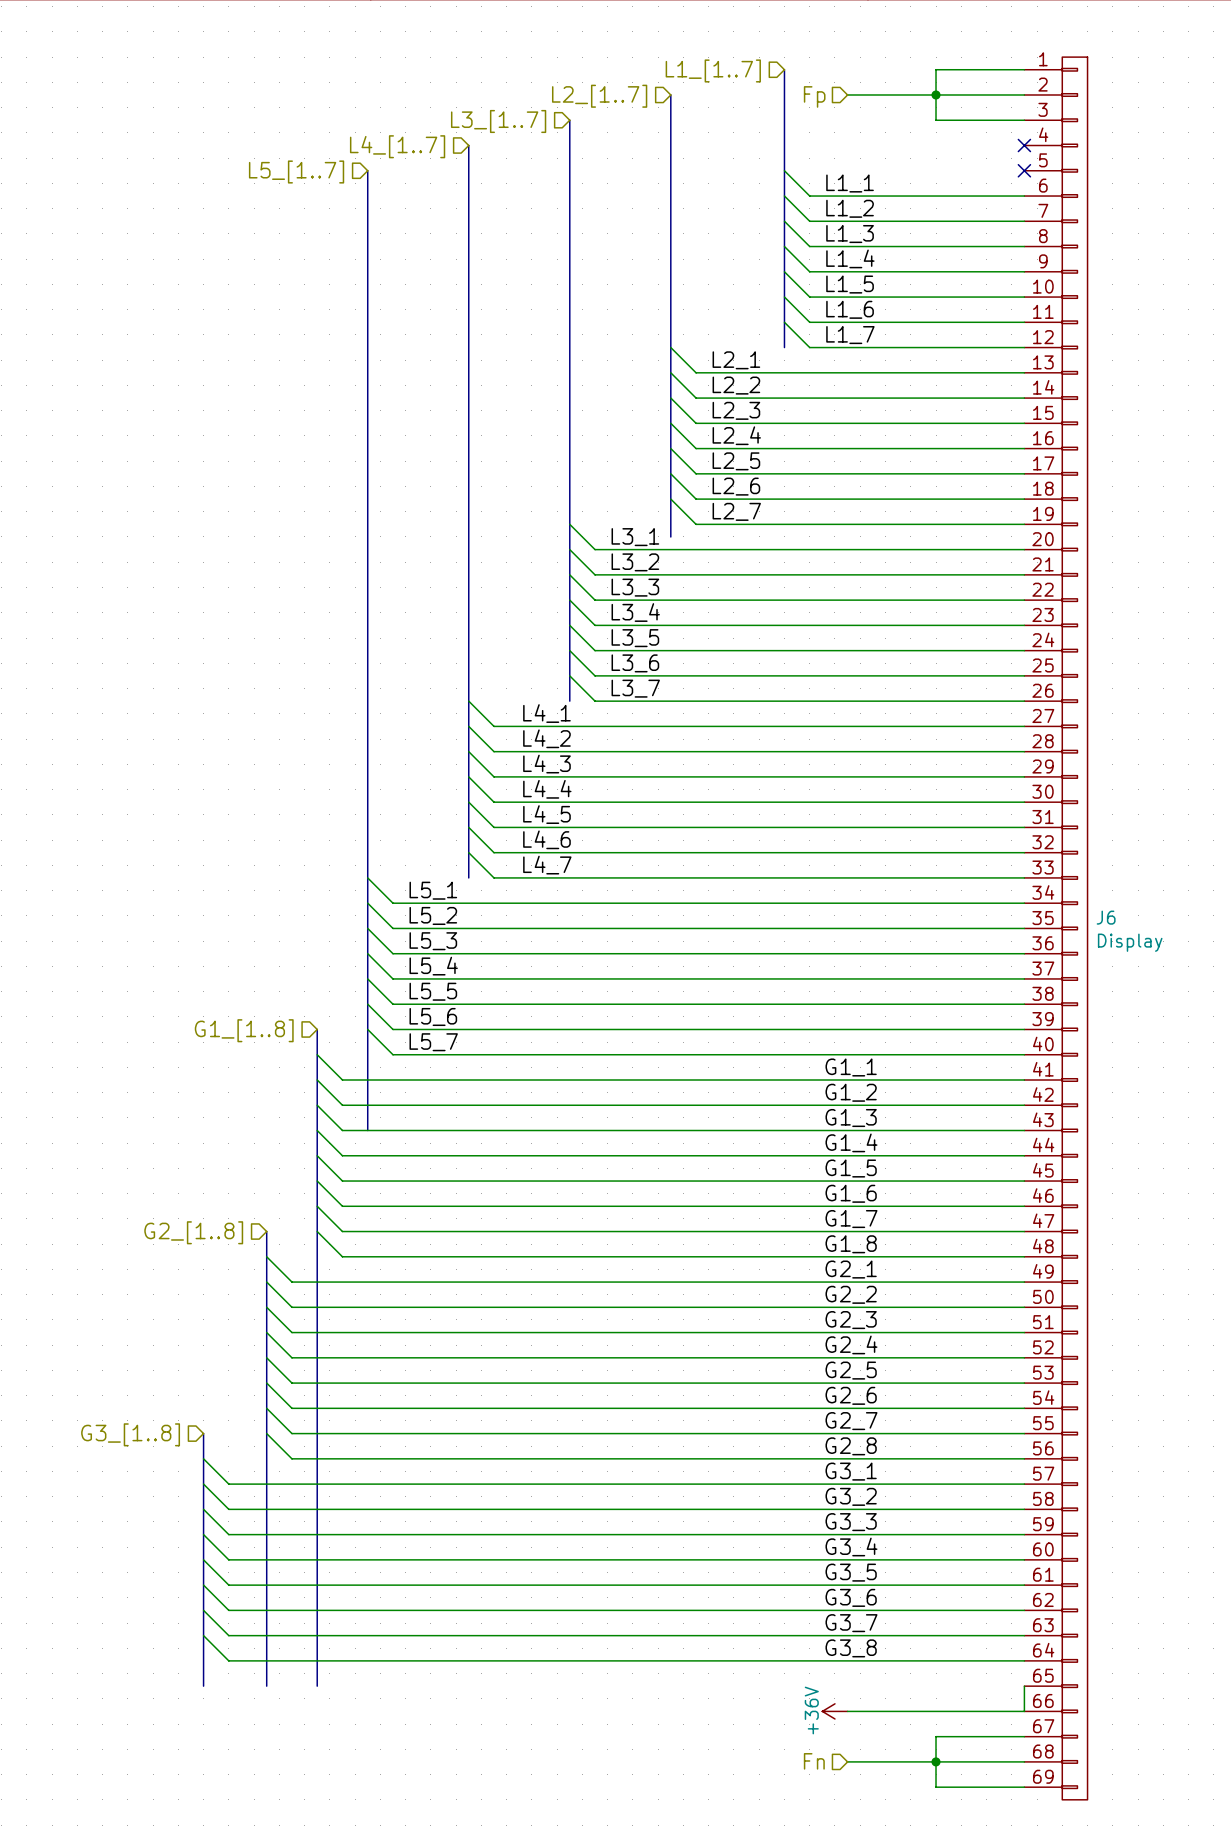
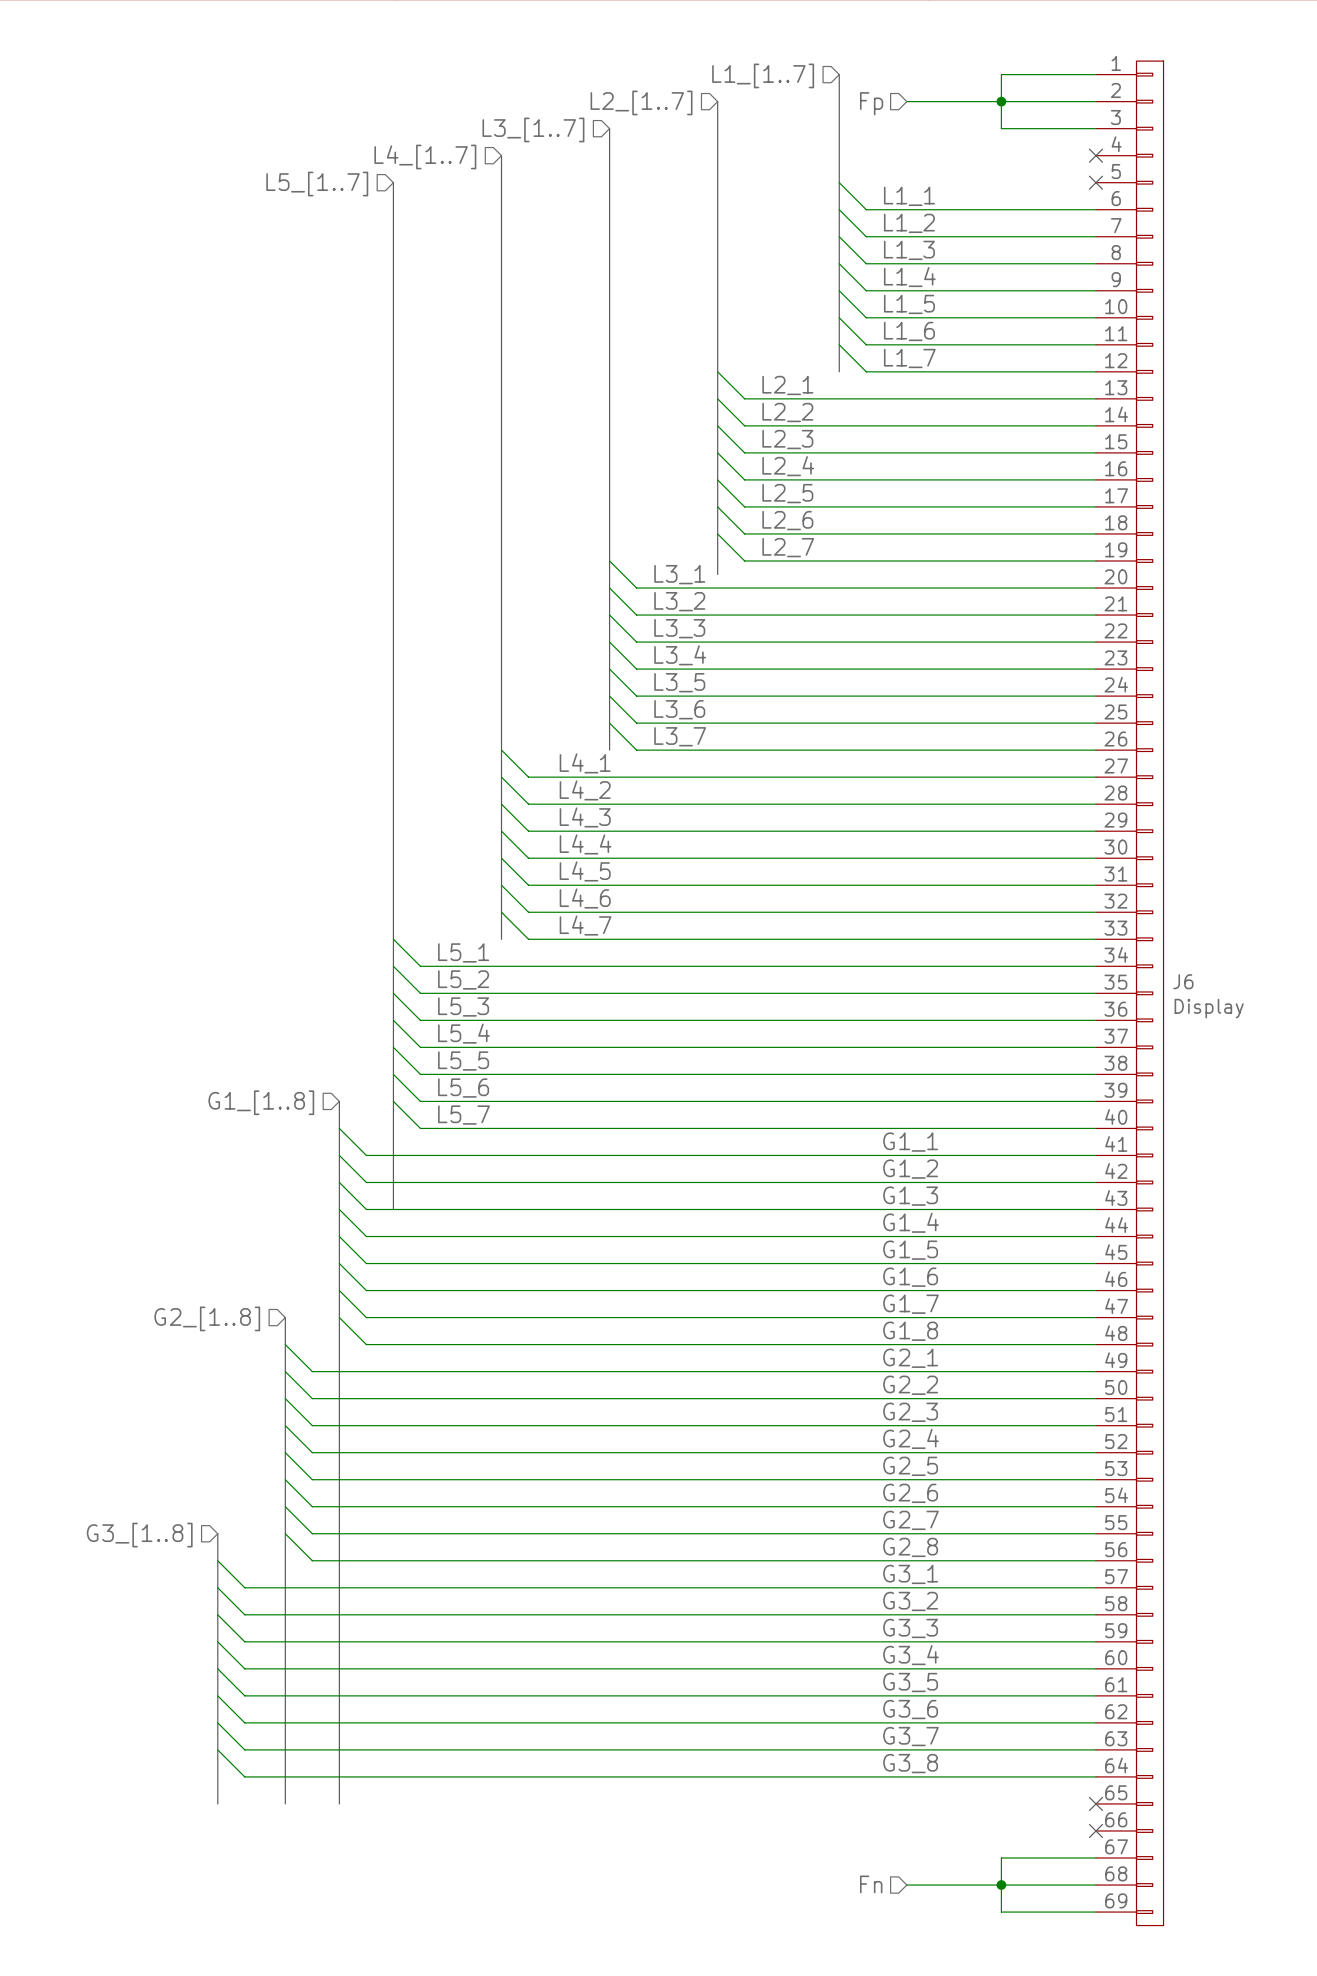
wire: (1024, 1686) (1024, 1711) (847, 1711) -> none
no-connect mark: none -> (1095, 1803)
power symbol: +36V (834, 1711) -> none
no-connect mark: none -> (1095, 1830)

